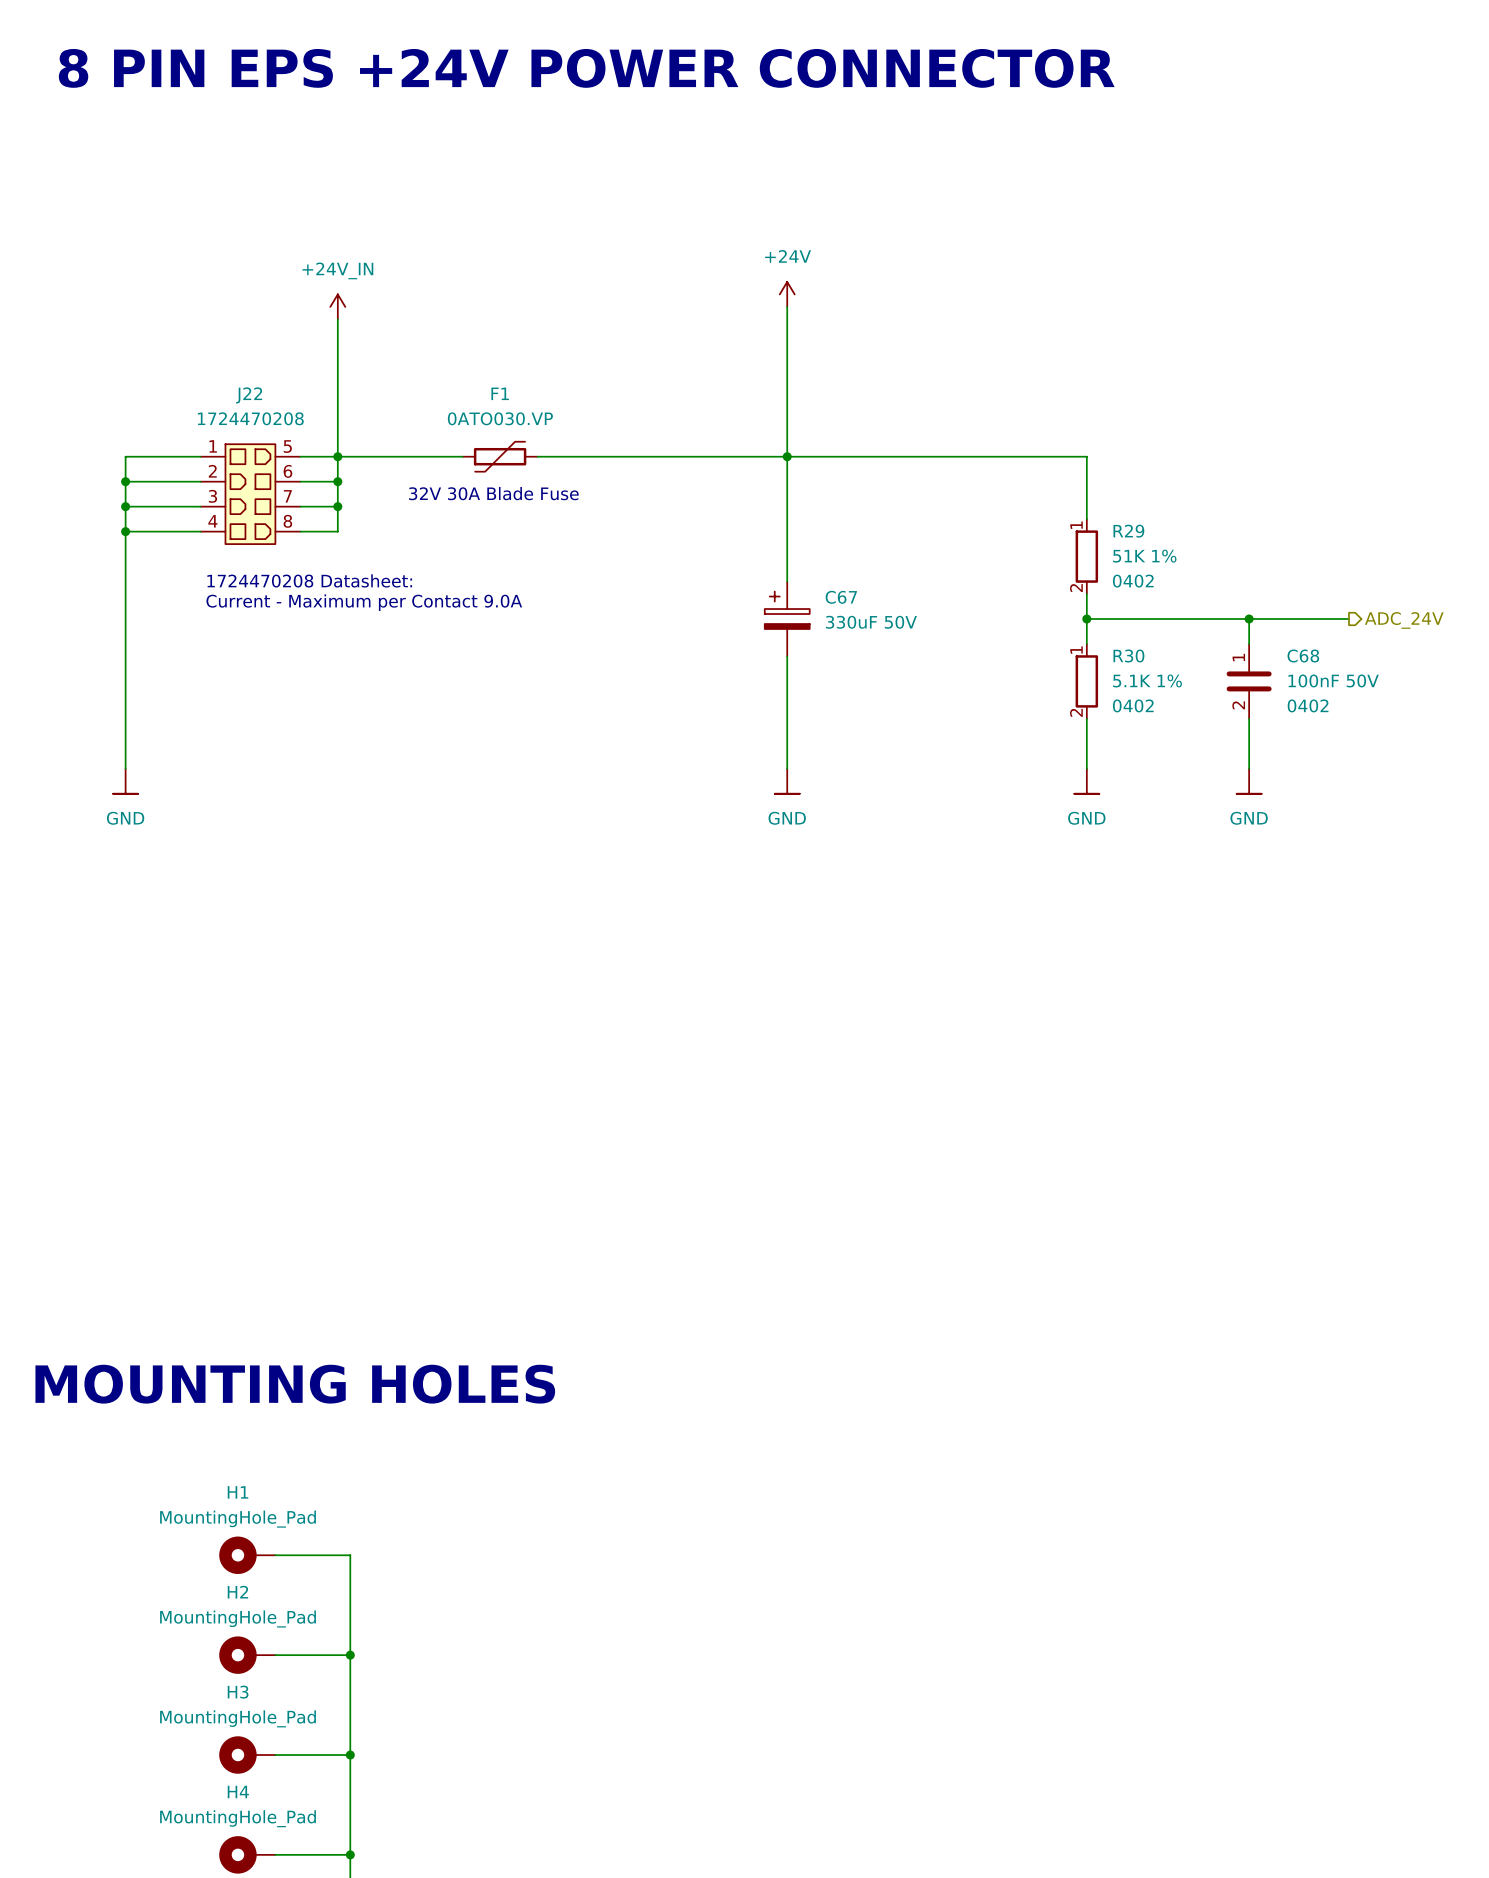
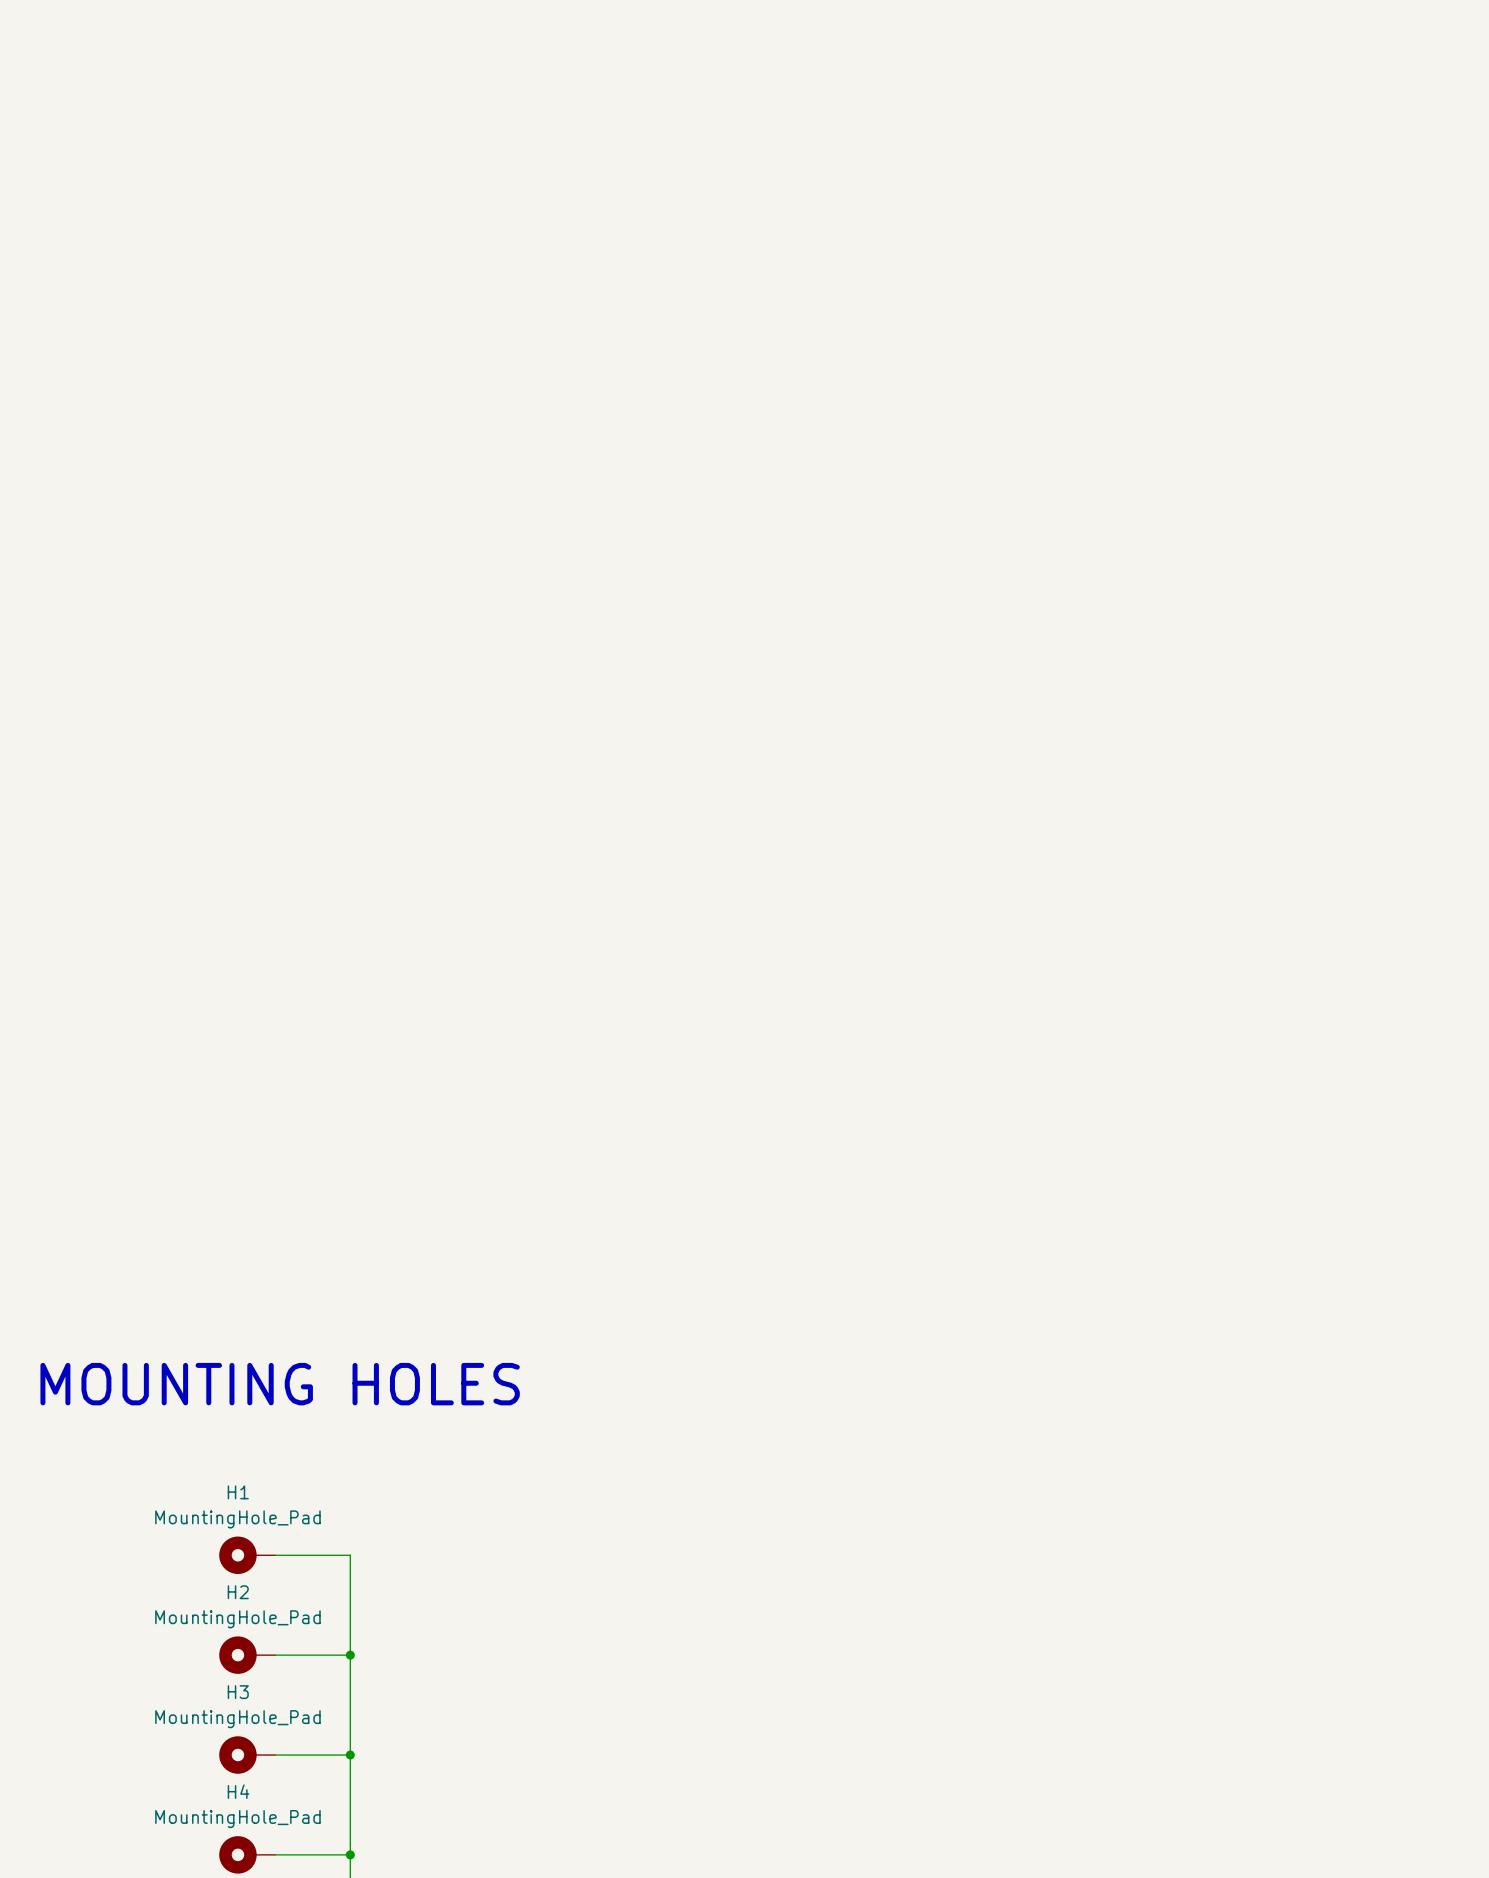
text: 8 PIN EPS +24V POWER CONNECTOR (586, 68) -> none
power symbol: +24V (787, 294) -> none
power symbol: +24V_IN (337, 306) -> none
wire: (787, 306) (787, 581) -> none
wire: (337, 319) (337, 531) (300, 531) -> none
wire: (200, 456) (125, 456) (125, 768) -> none
wire: (300, 456) (462, 456) -> none
junction: (337, 456) -> none
F1: 0ATO030.VP (500, 456) -> none
wire: (537, 456) (1086, 456) (1086, 519) -> none
junction: (787, 456) -> none
wire: (125, 481) (200, 481) -> none
junction: (125, 481) -> none
wire: (300, 481) (337, 481) -> none
junction: (337, 481) -> none
text: 32V 30A Blade Fuse (493, 493) -> none
J22: 1724470208 (250, 494) -> none
wire: (125, 506) (200, 506) -> none
junction: (125, 506) -> none
wire: (300, 506) (337, 506) -> none
junction: (337, 506) -> none
wire: (125, 531) (200, 531) -> none
junction: (125, 531) -> none
R29: 51K 1% (1086, 556) -> none
text: 1724470208 Datasheet: (309, 580) -> none
wire: (1086, 594) (1086, 643) -> none
text: Current - Maximum per Contact 9.0A (364, 602) -> none
C67: 330uF 50V (787, 619) -> none
wire: (1086, 619) (1348, 619) -> none
junction: (1086, 619) -> none
wire: (1249, 619) (1249, 643) -> none
junction: (1249, 619) -> none
hierarchical label: ADC_24V (1404, 620) -> none
wire: (787, 656) (787, 768) -> none
R30: 5.1K 1% (1086, 681) -> none
C68: 100nF 50V (1249, 681) -> none
wire: (1086, 718) (1086, 768) -> none
wire: (1249, 718) (1249, 768) -> none
power symbol: GND (125, 781) -> none
power symbol: GND (787, 781) -> none
power symbol: GND (1086, 781) -> none
power symbol: GND (1249, 781) -> none

